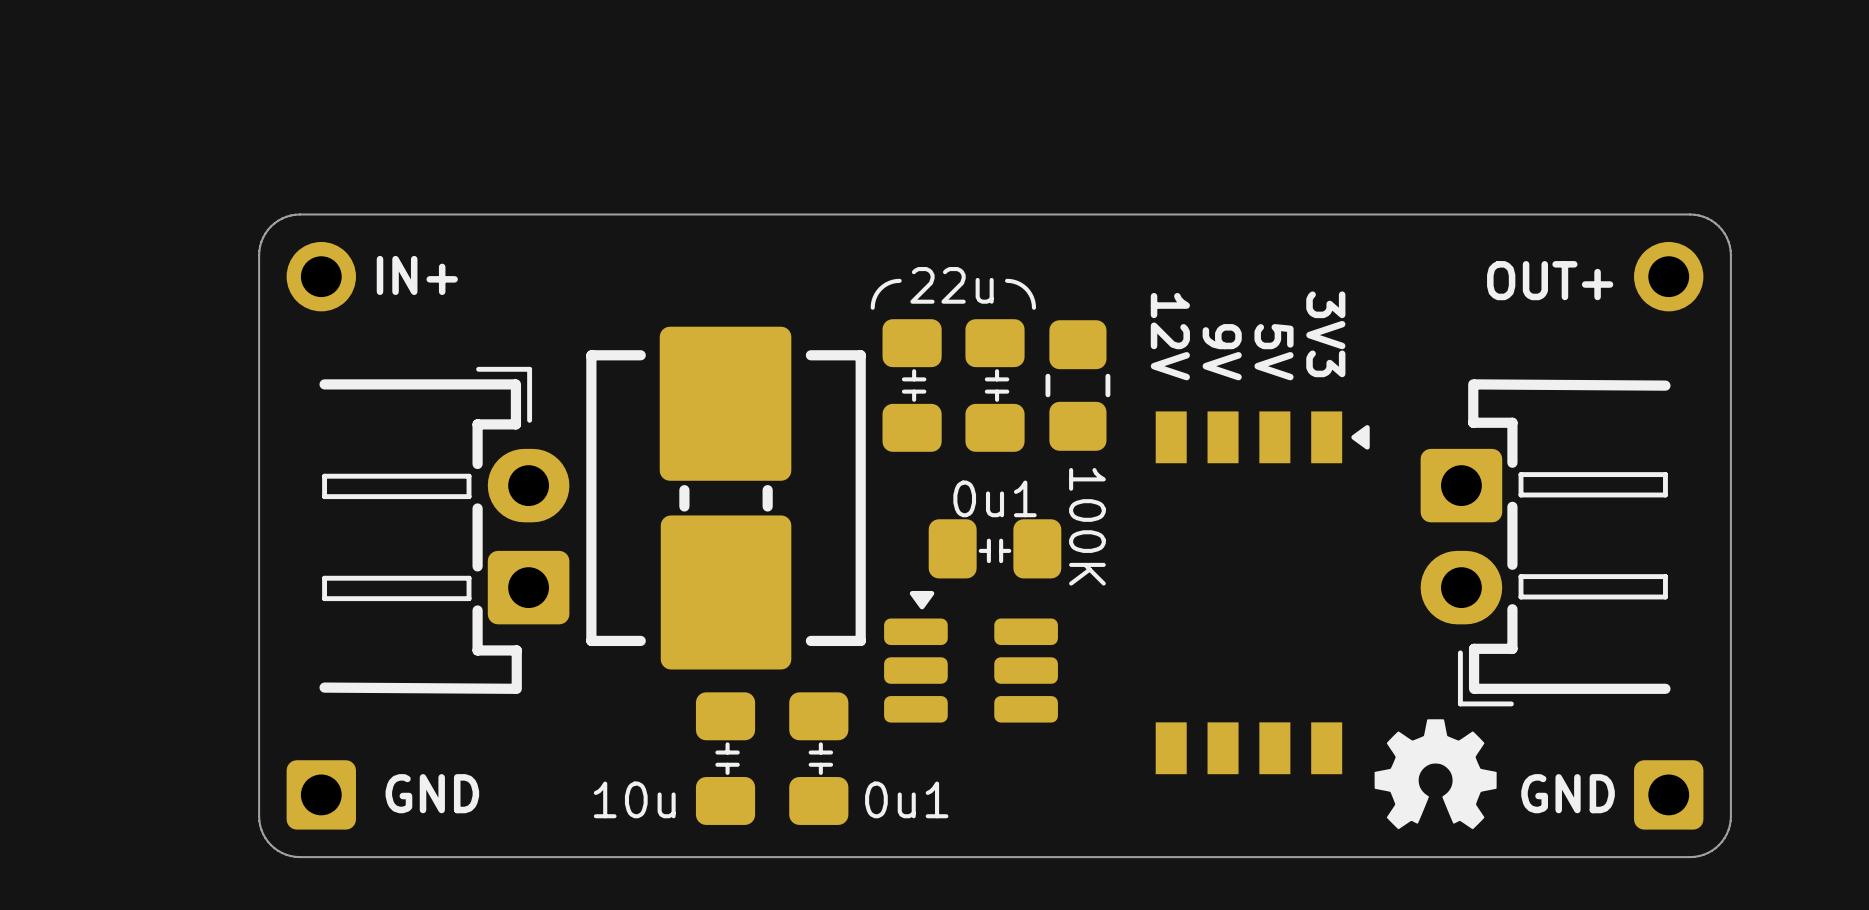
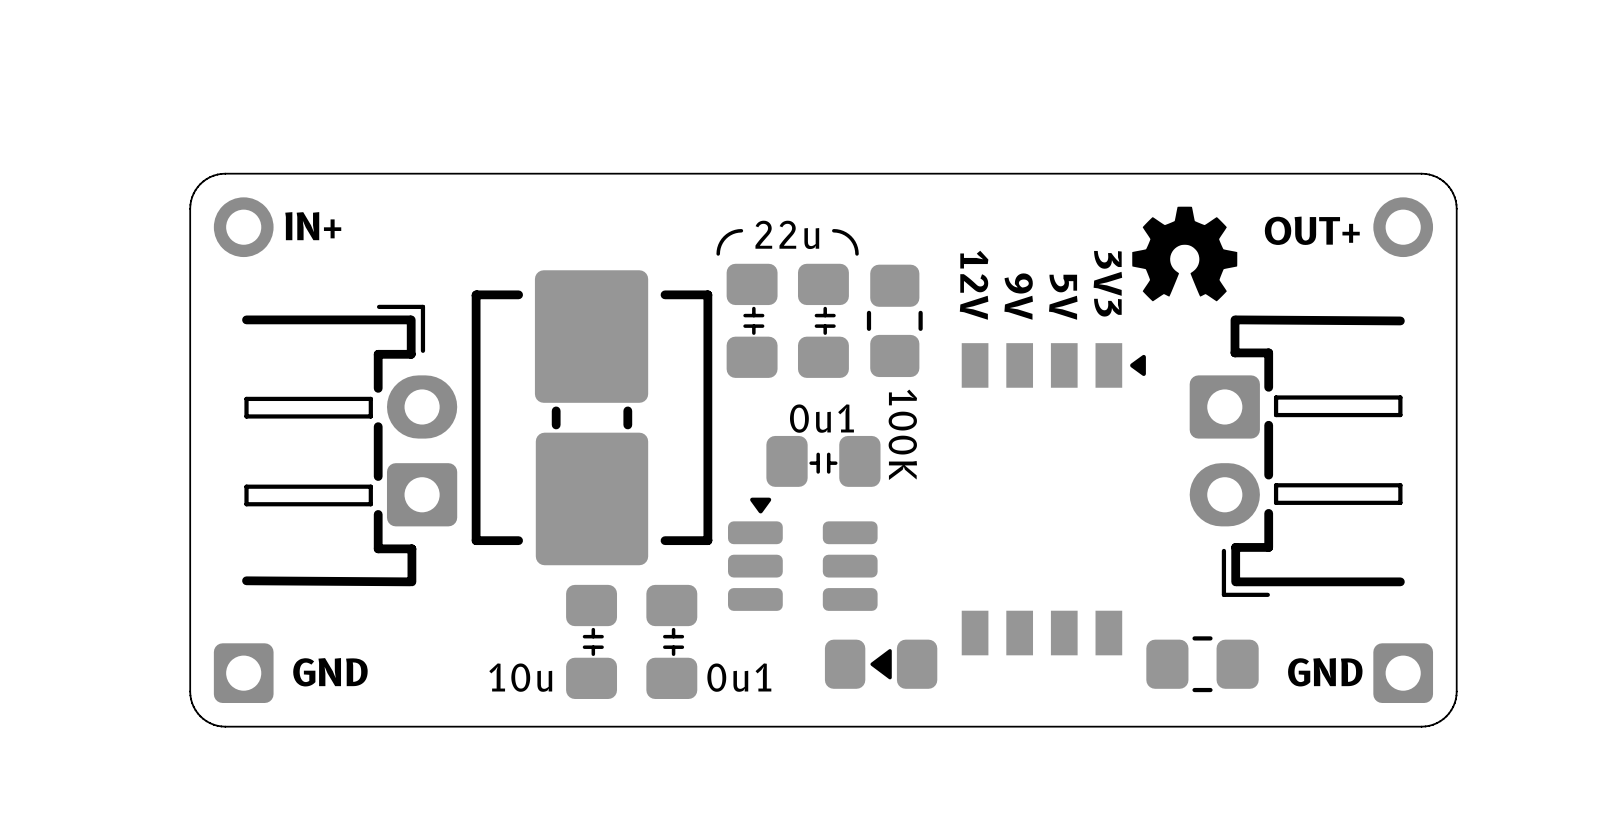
drawing position: (1435, 774) -> (1184, 253)
part: none -> (881, 664)
part: none -> (1202, 664)

